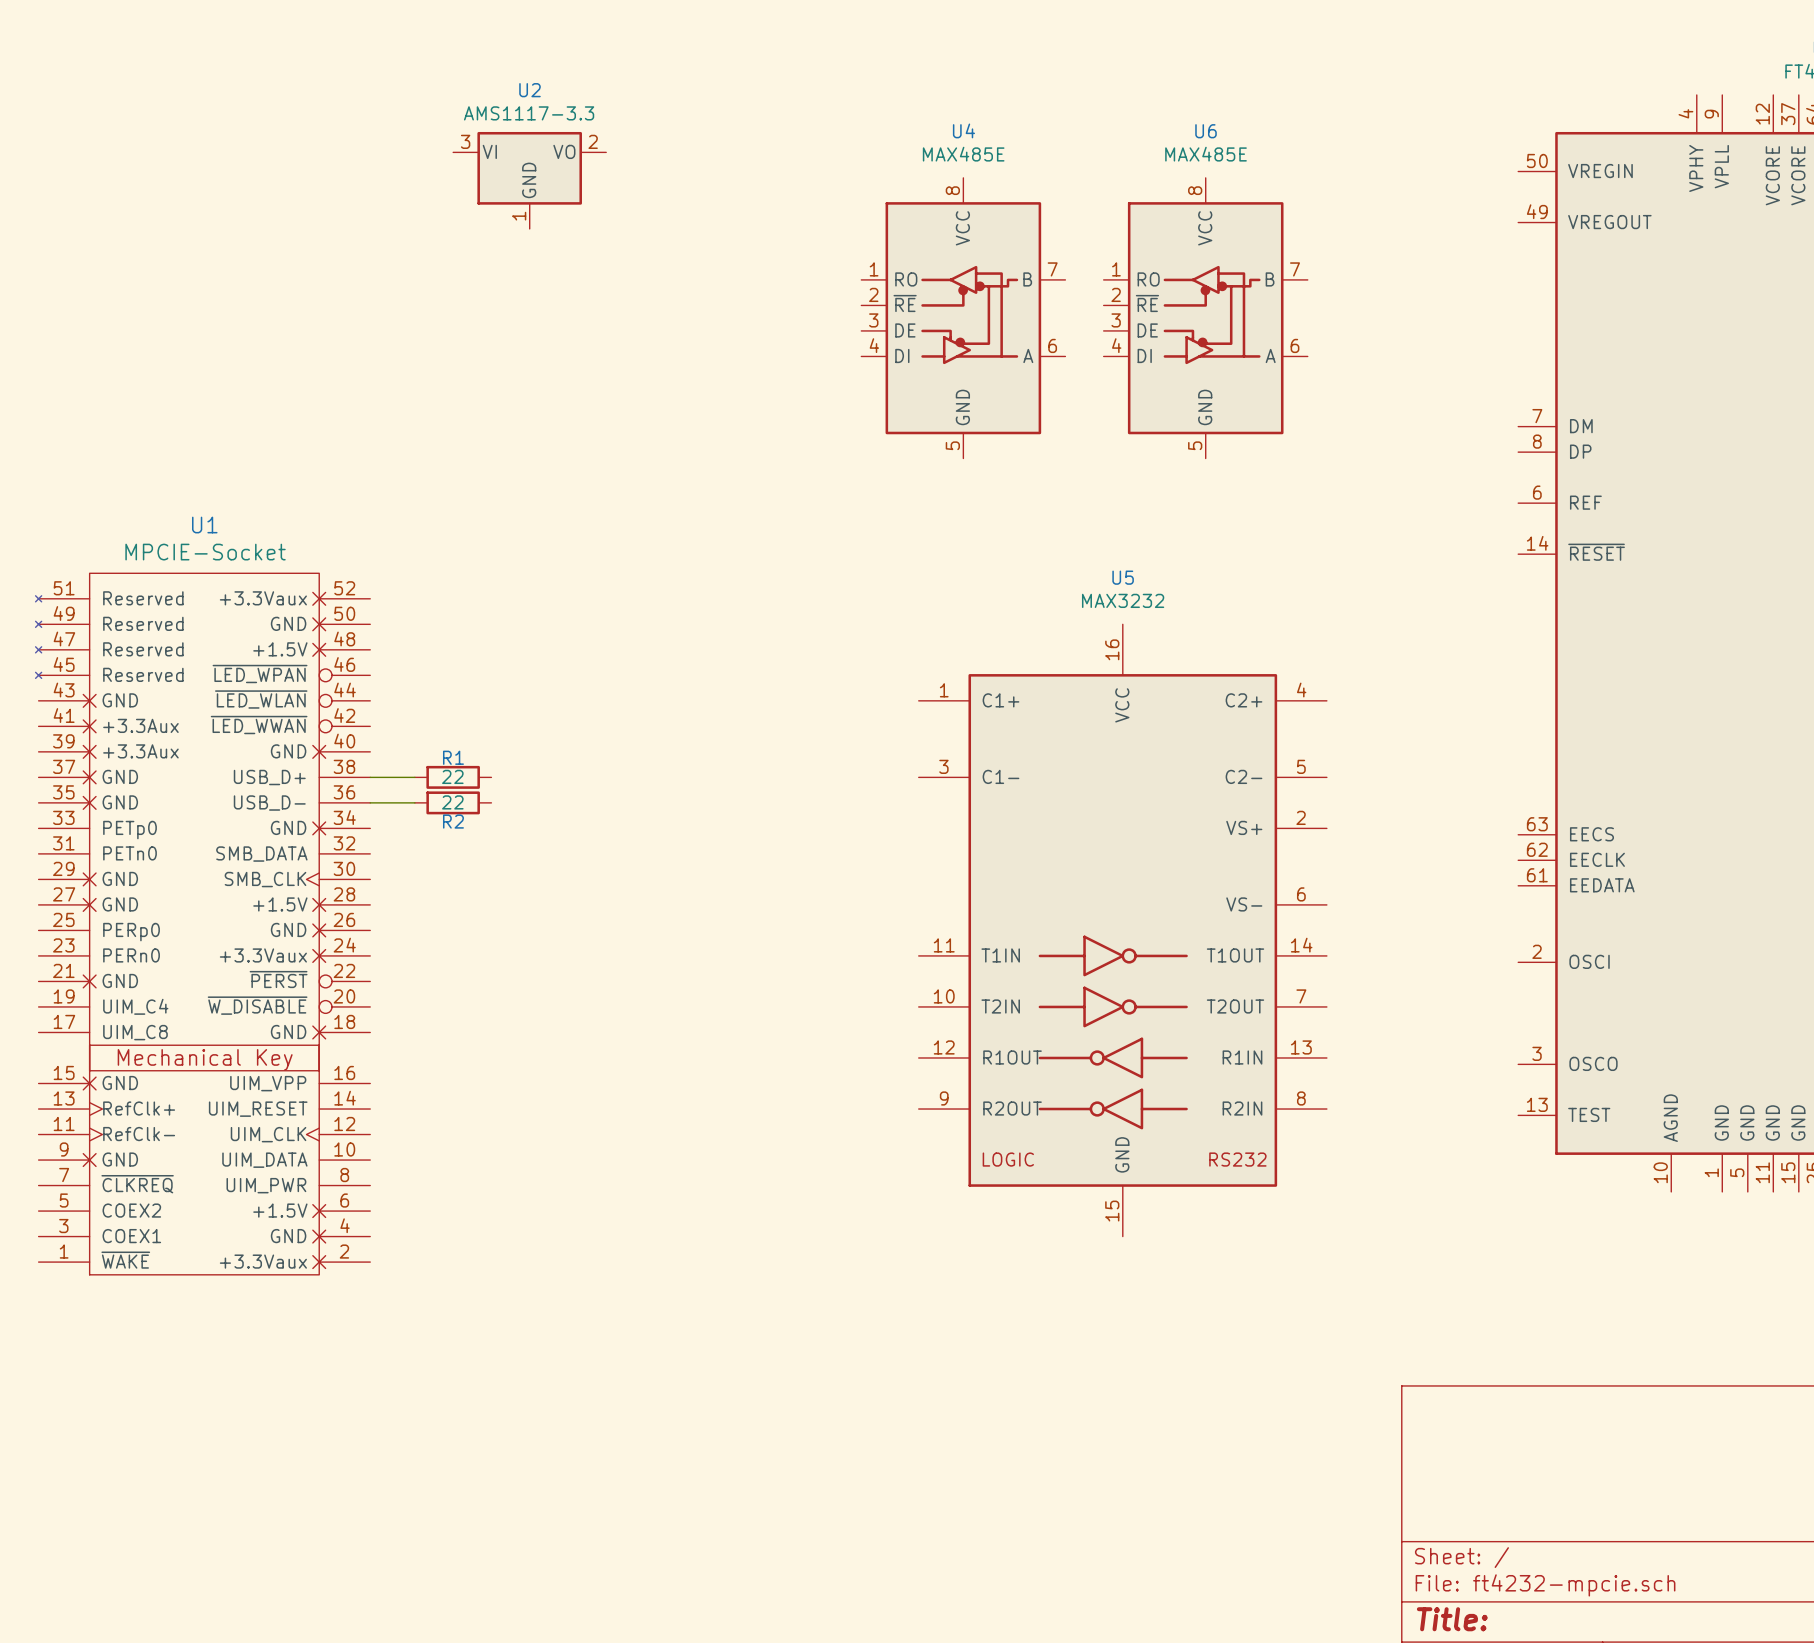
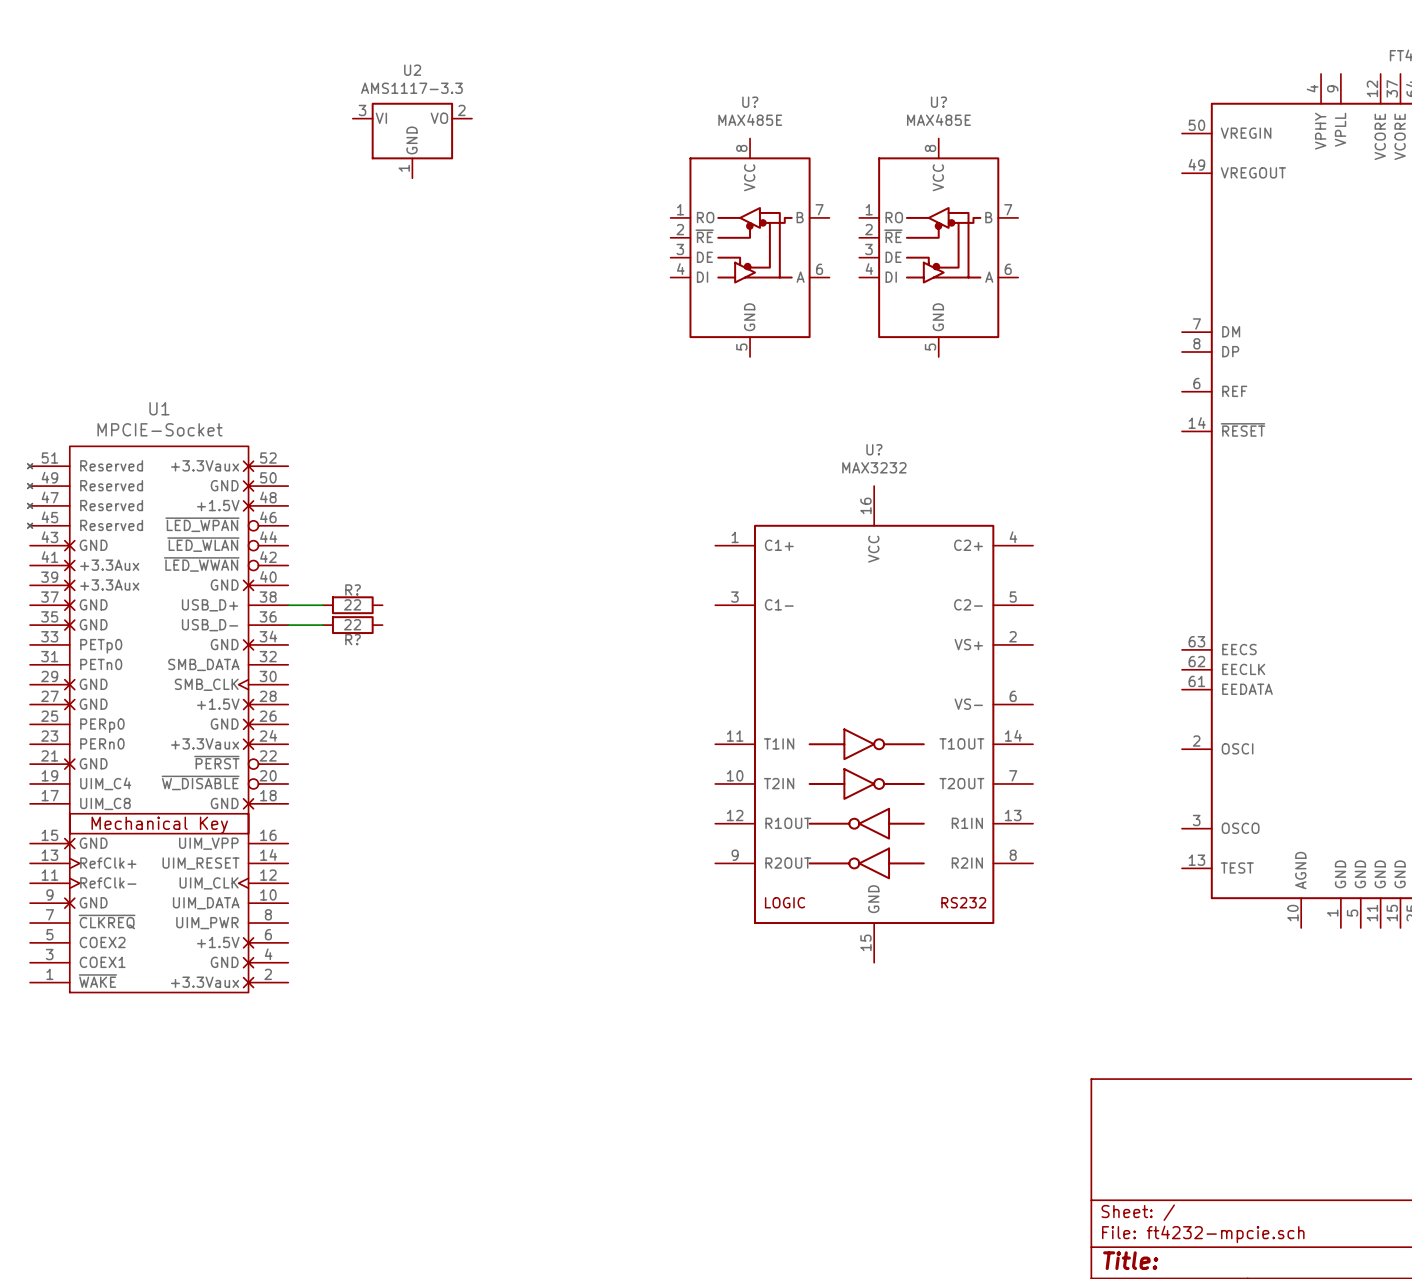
U4 name: U4 (963, 130) -> U? (750, 102)
U6 name: U6 (1206, 131) -> U? (938, 102)
U5 name: U5 (1123, 577) -> U? (874, 449)
R1 name: R1 (453, 757) -> R? (353, 589)
R2 name: R2 (453, 821) -> R? (353, 639)

